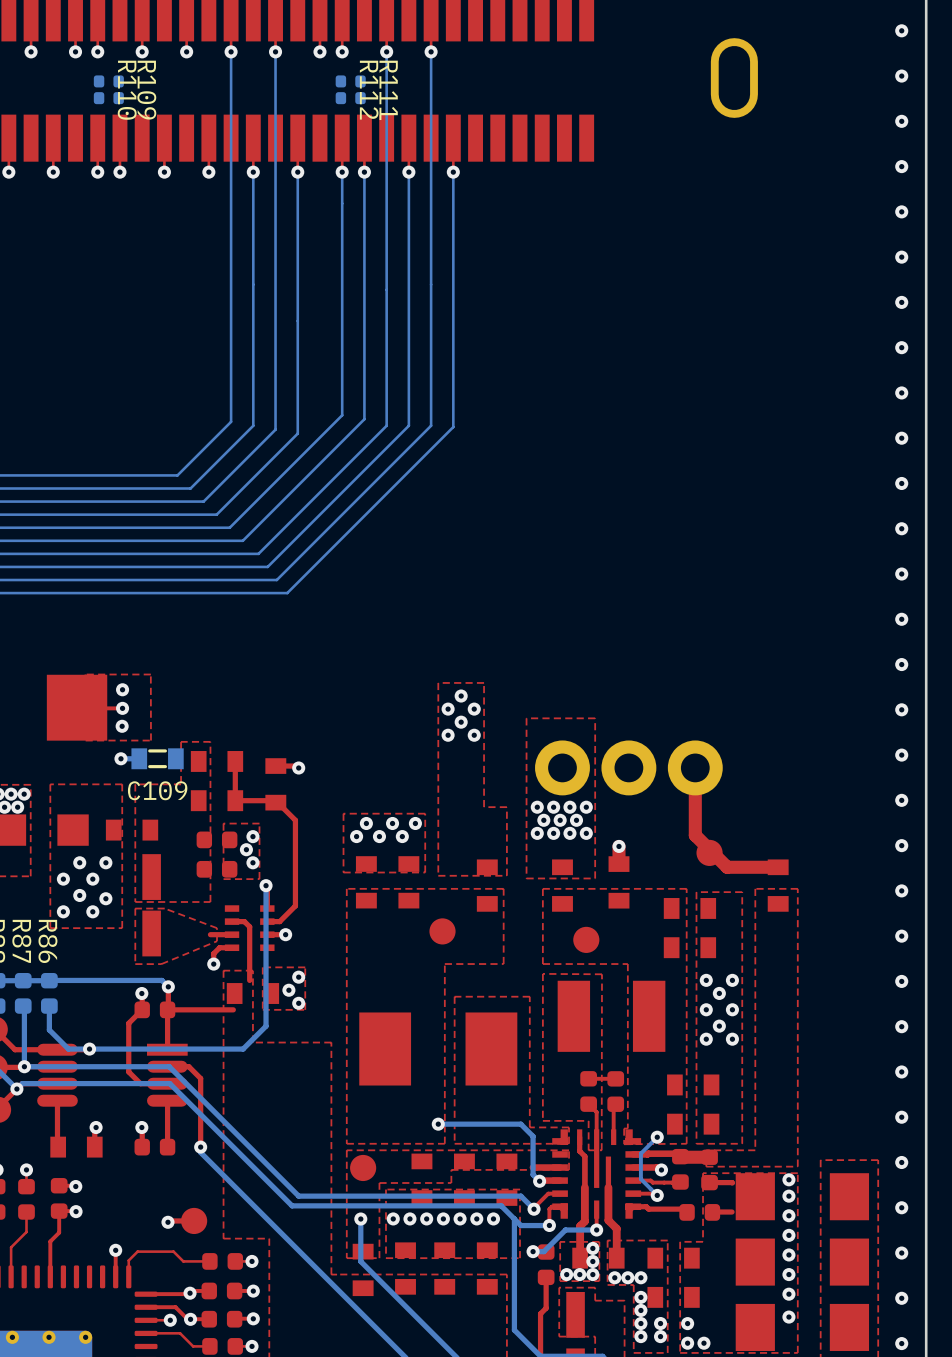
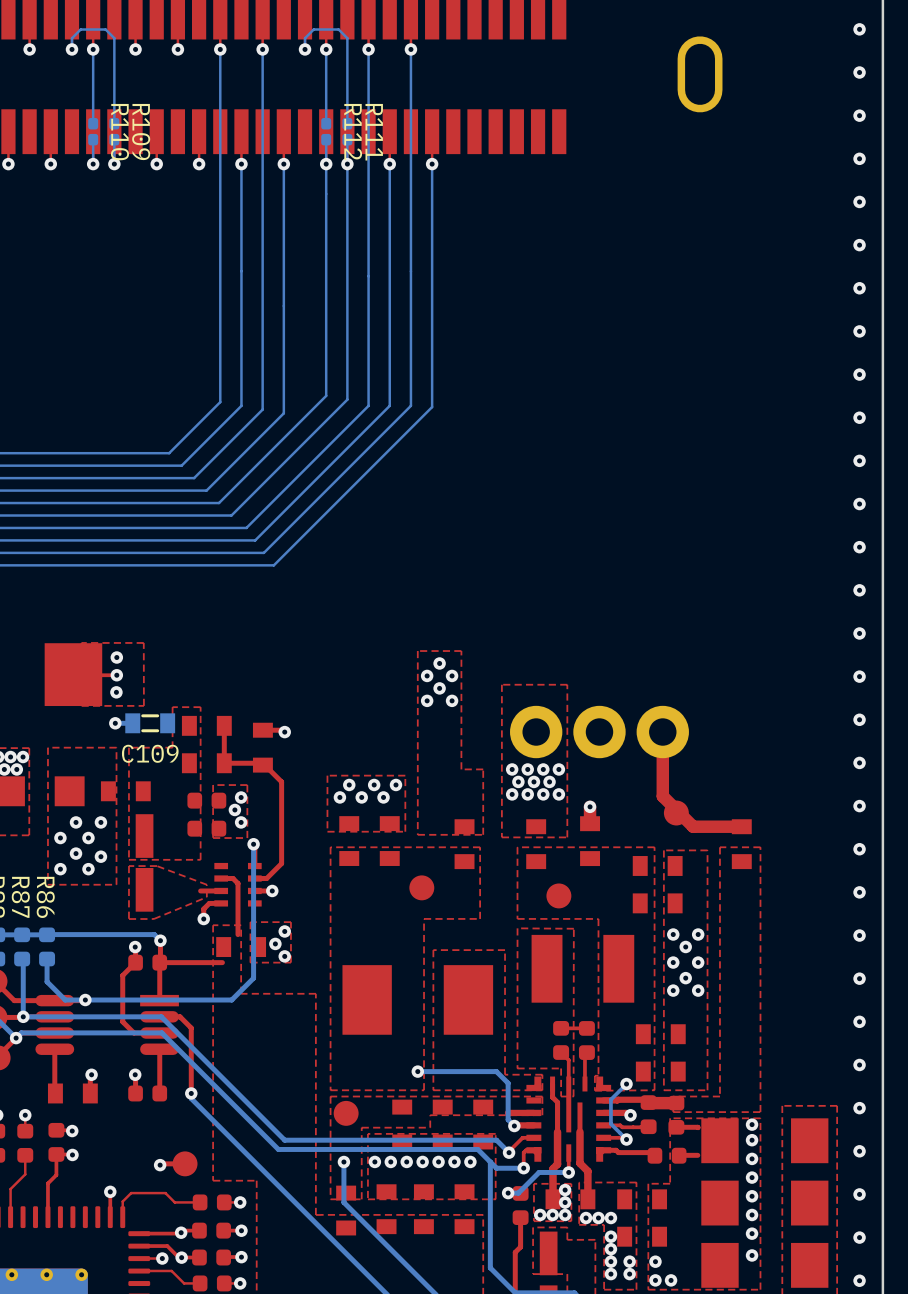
bottom track: none -> (71, 49) (71, 38) (80, 29) (105, 29) (114, 38) (114, 123)
bottom track: none -> (93, 49) (93, 124)
bottom track: none -> (305, 49) (305, 38) (313, 29) (338, 29) (347, 38) (347, 123)
bottom track: none -> (326, 49) (326, 124)
R110 position: (99, 89) -> (93, 131)
R109 position: (118, 89) -> (114, 131)
R112 position: (340, 89) -> (326, 131)
R111 position: (360, 89) -> (347, 131)
bottom track: none -> (93, 139) (93, 164)
bottom track: none -> (114, 139) (114, 164)
bottom track: none -> (326, 139) (326, 164)
bottom track: none -> (347, 139) (347, 164)

